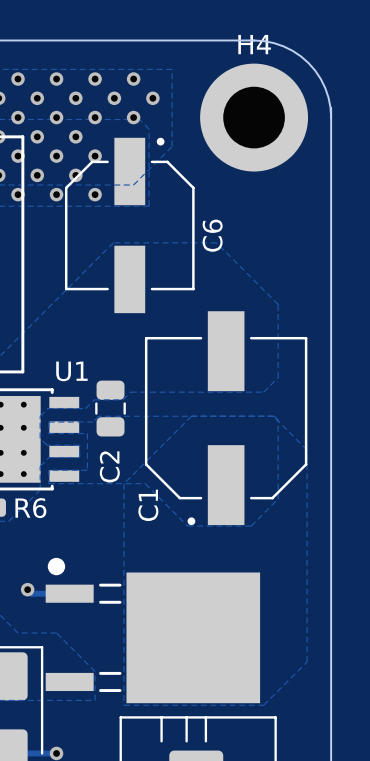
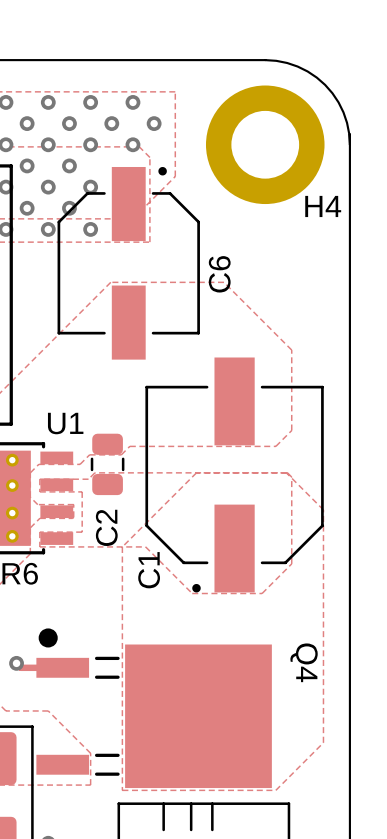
H4 name position: H4 (254, 44) -> H4 (323, 206)
Q4 name: none -> Q4 (304, 662)

